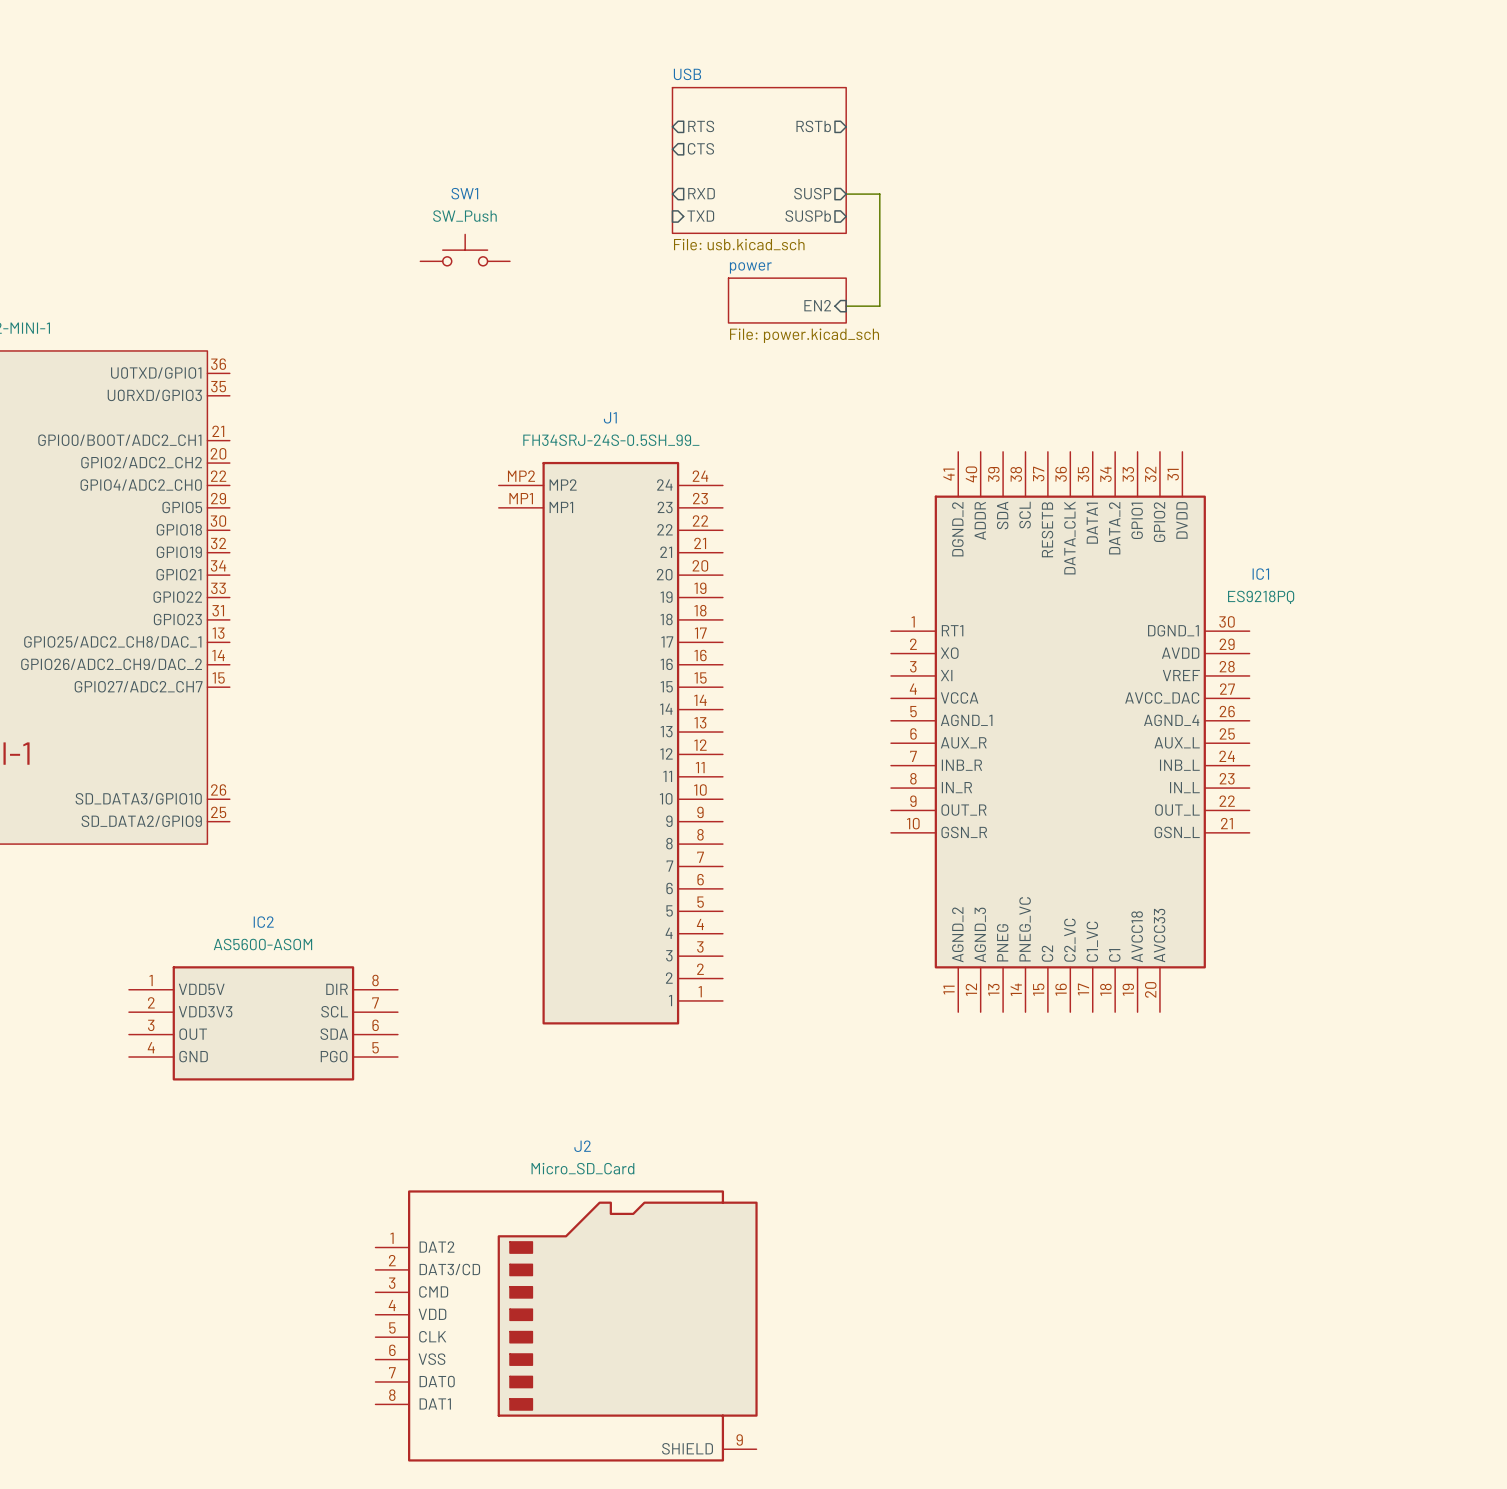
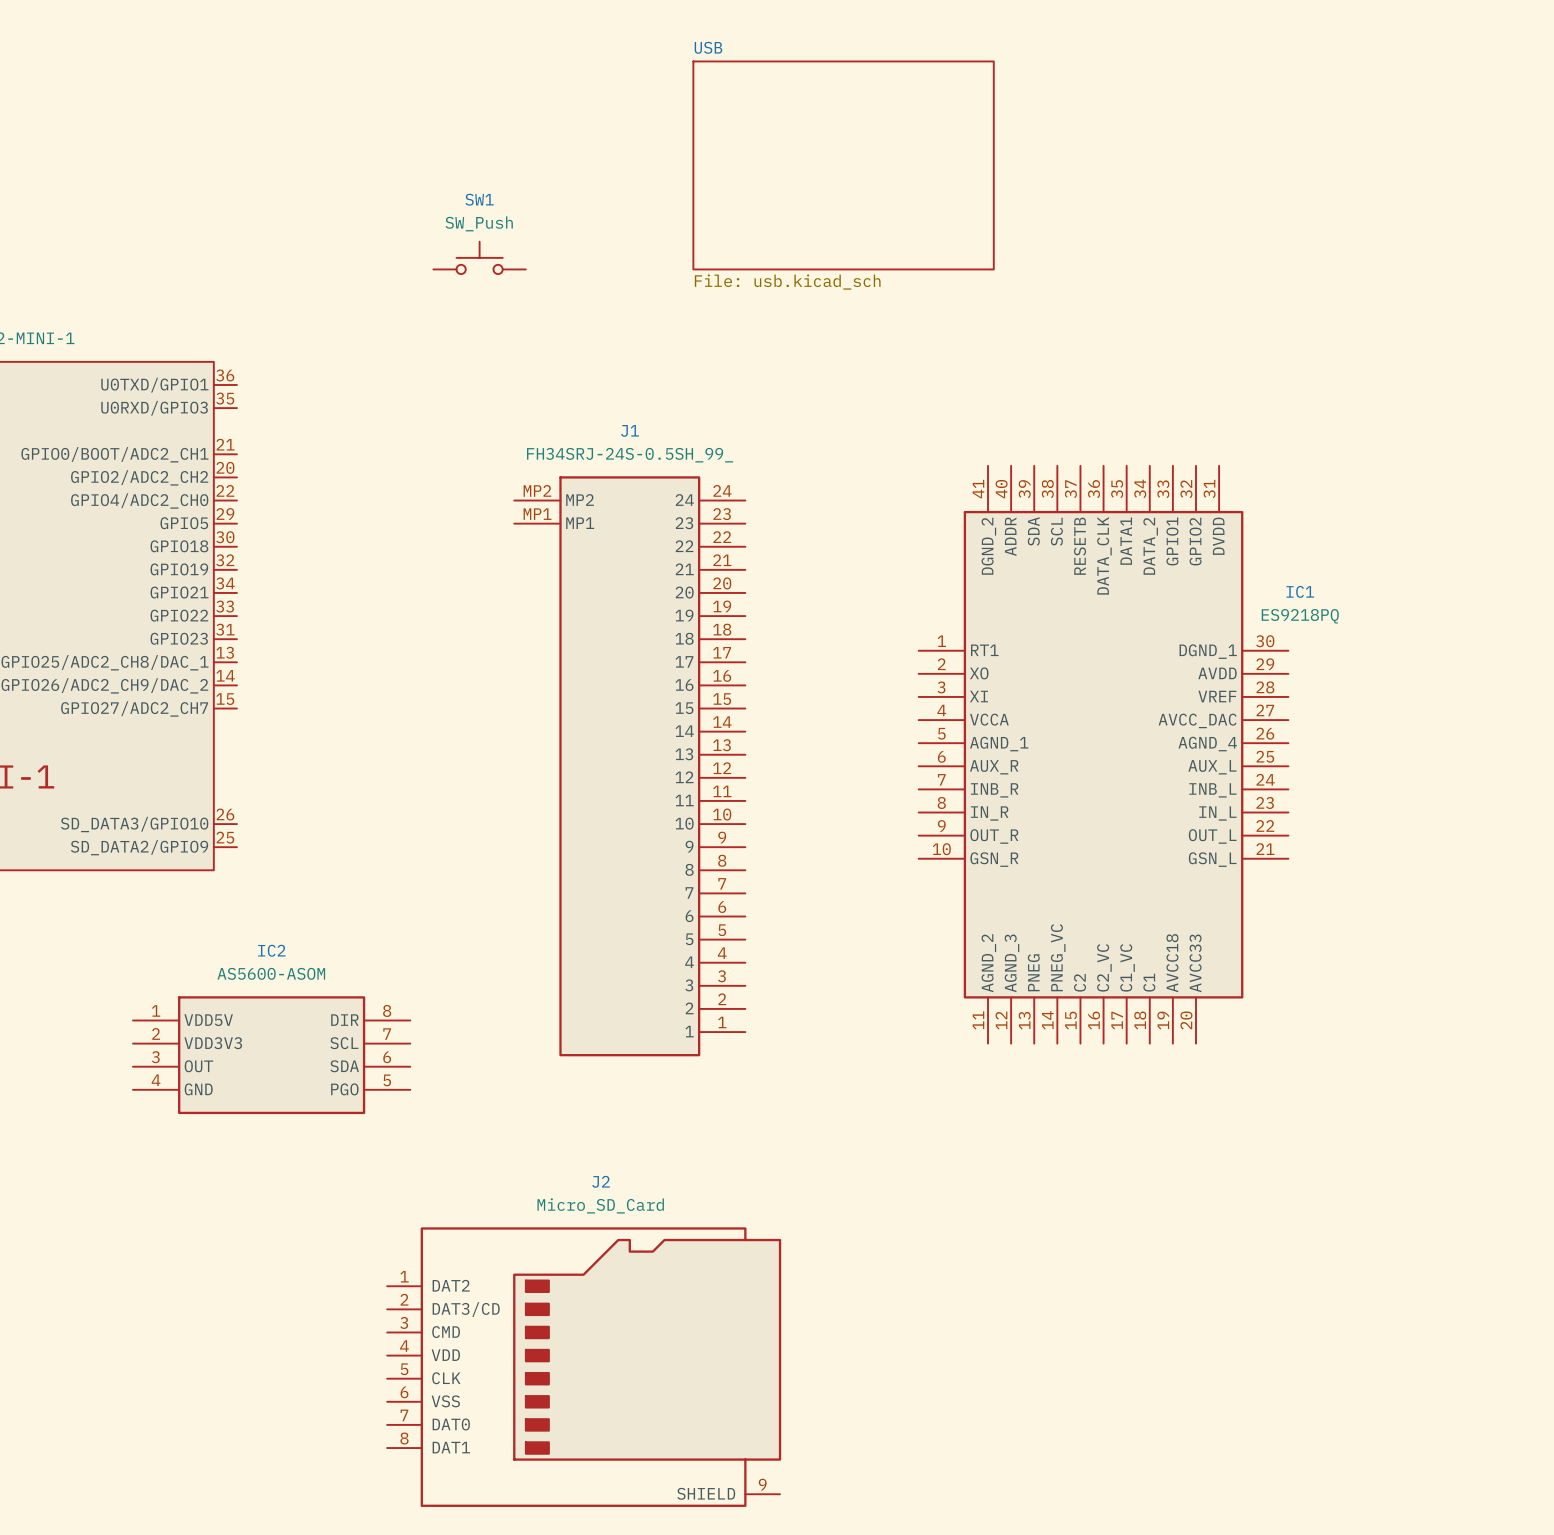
sheet pin: RTS (701, 126) -> none
sheet pin: RSTb (813, 126) -> none
sheet pin: CTS (700, 148) -> none
sheet USB: File: usb.kicad_sch (759, 160) -> none
sheet USB: none -> File: usb.kicad_sch (843, 165)
sheet pin: RXD (701, 193) -> none
sheet pin: SUSP (812, 193) -> none
wire: (846, 194) (879, 194) (879, 306) (846, 306) -> none
sheet pin: TXD (700, 216) -> none
sheet pin: SUSPb (808, 216) -> none
sheet power: File: power.kicad_sch (787, 300) -> none
sheet pin: EN2 (817, 305) -> none

